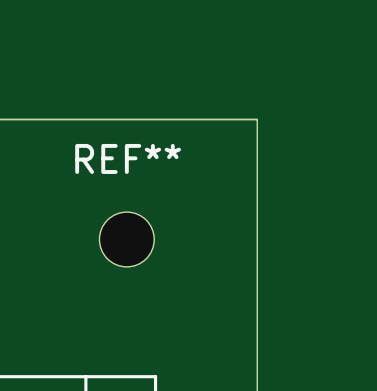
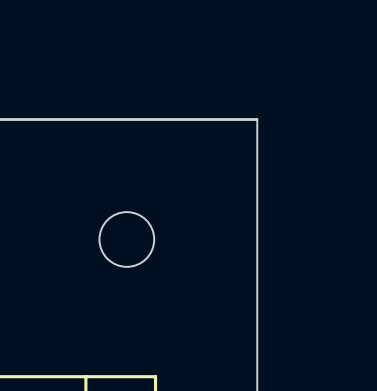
REF** name: REF** (128, 158) -> none

